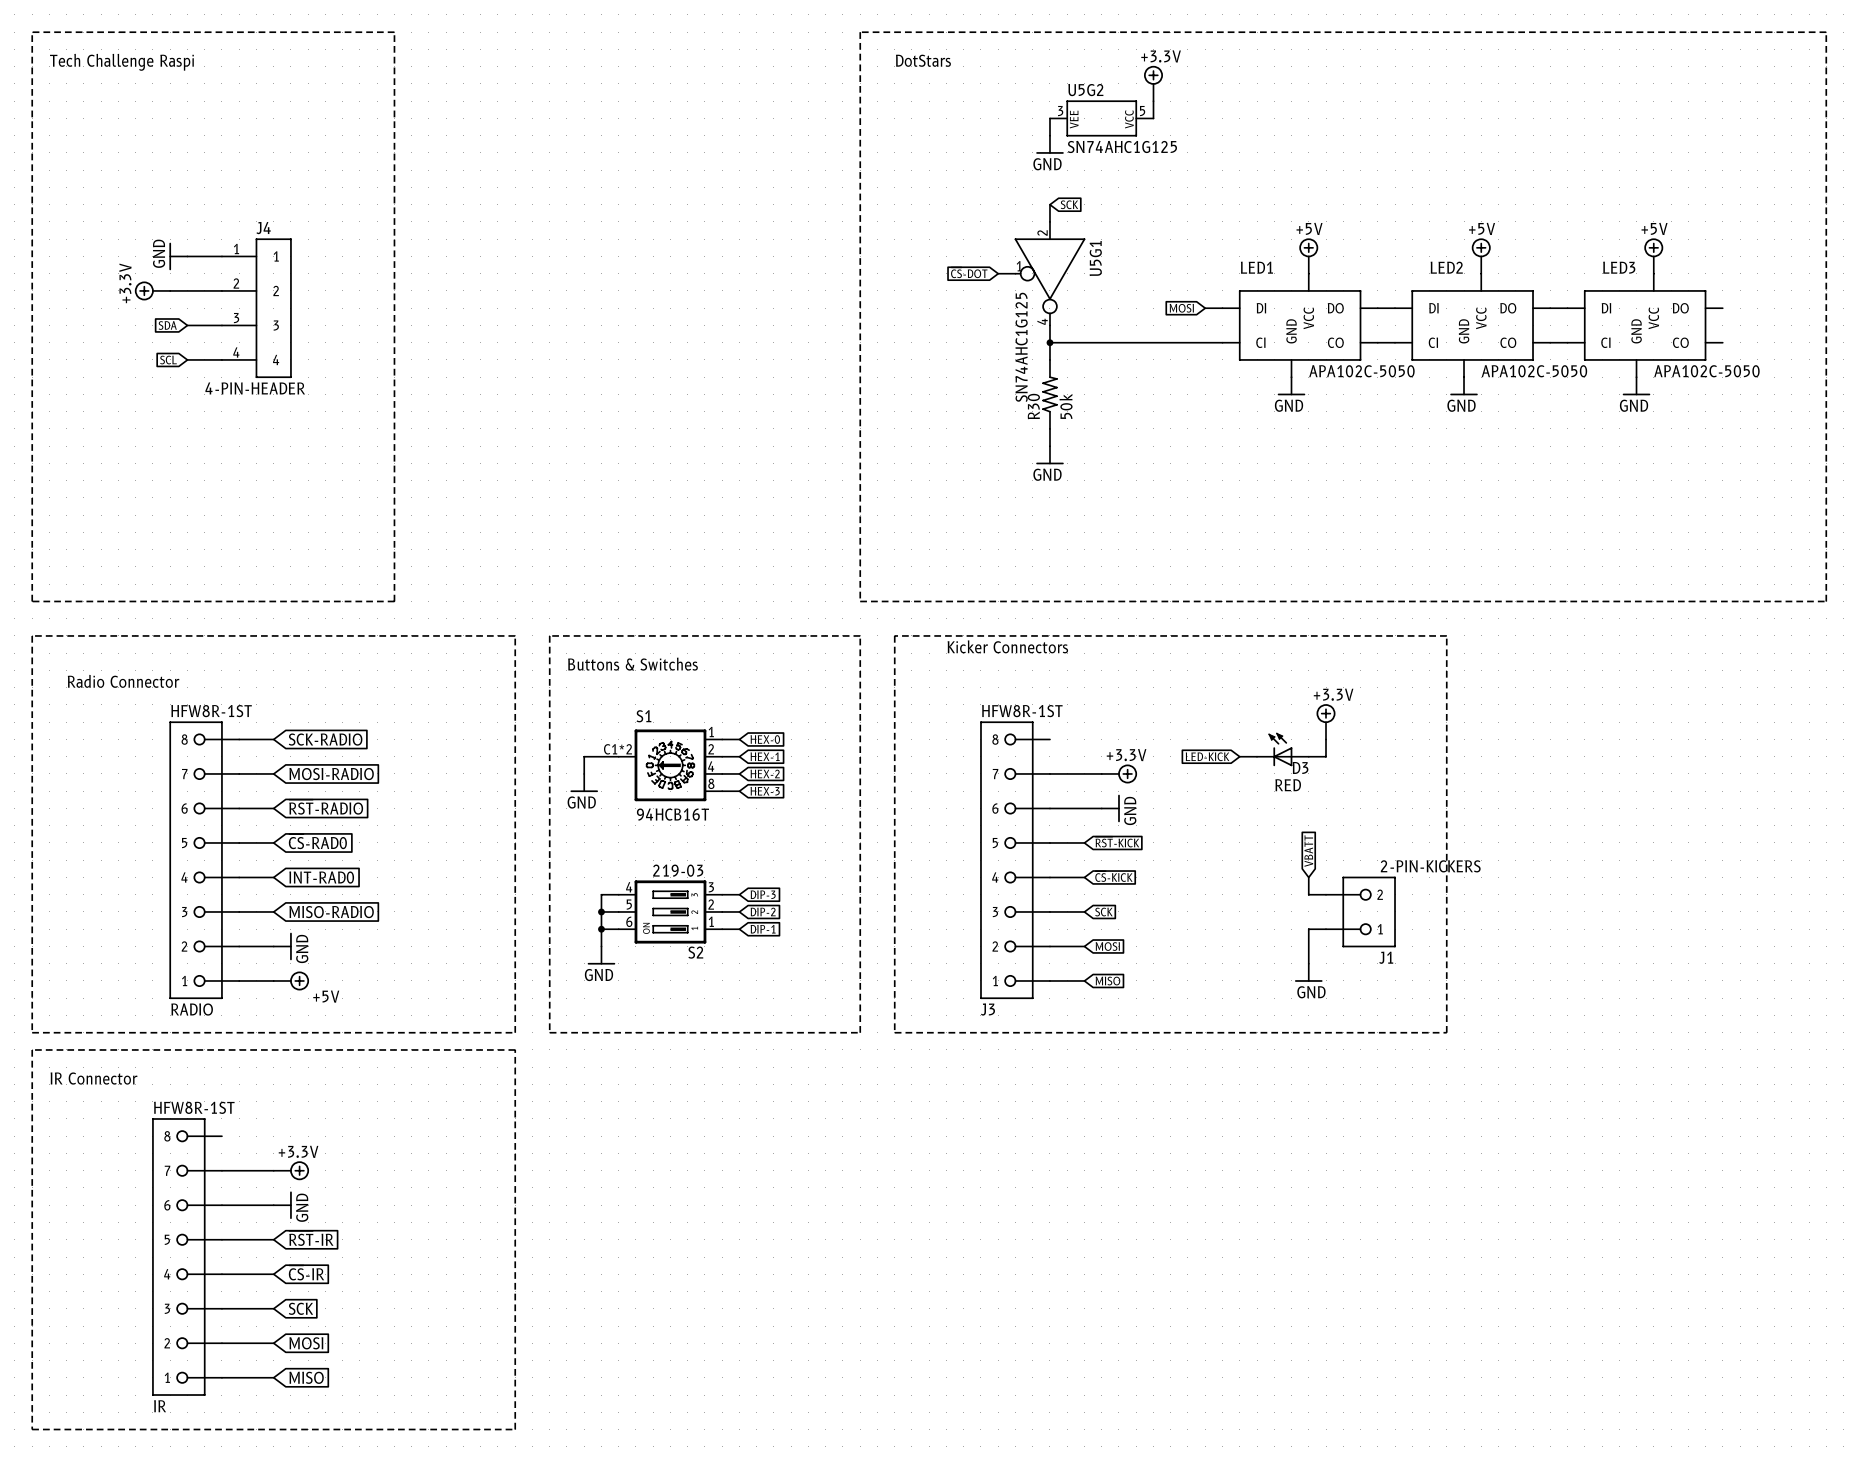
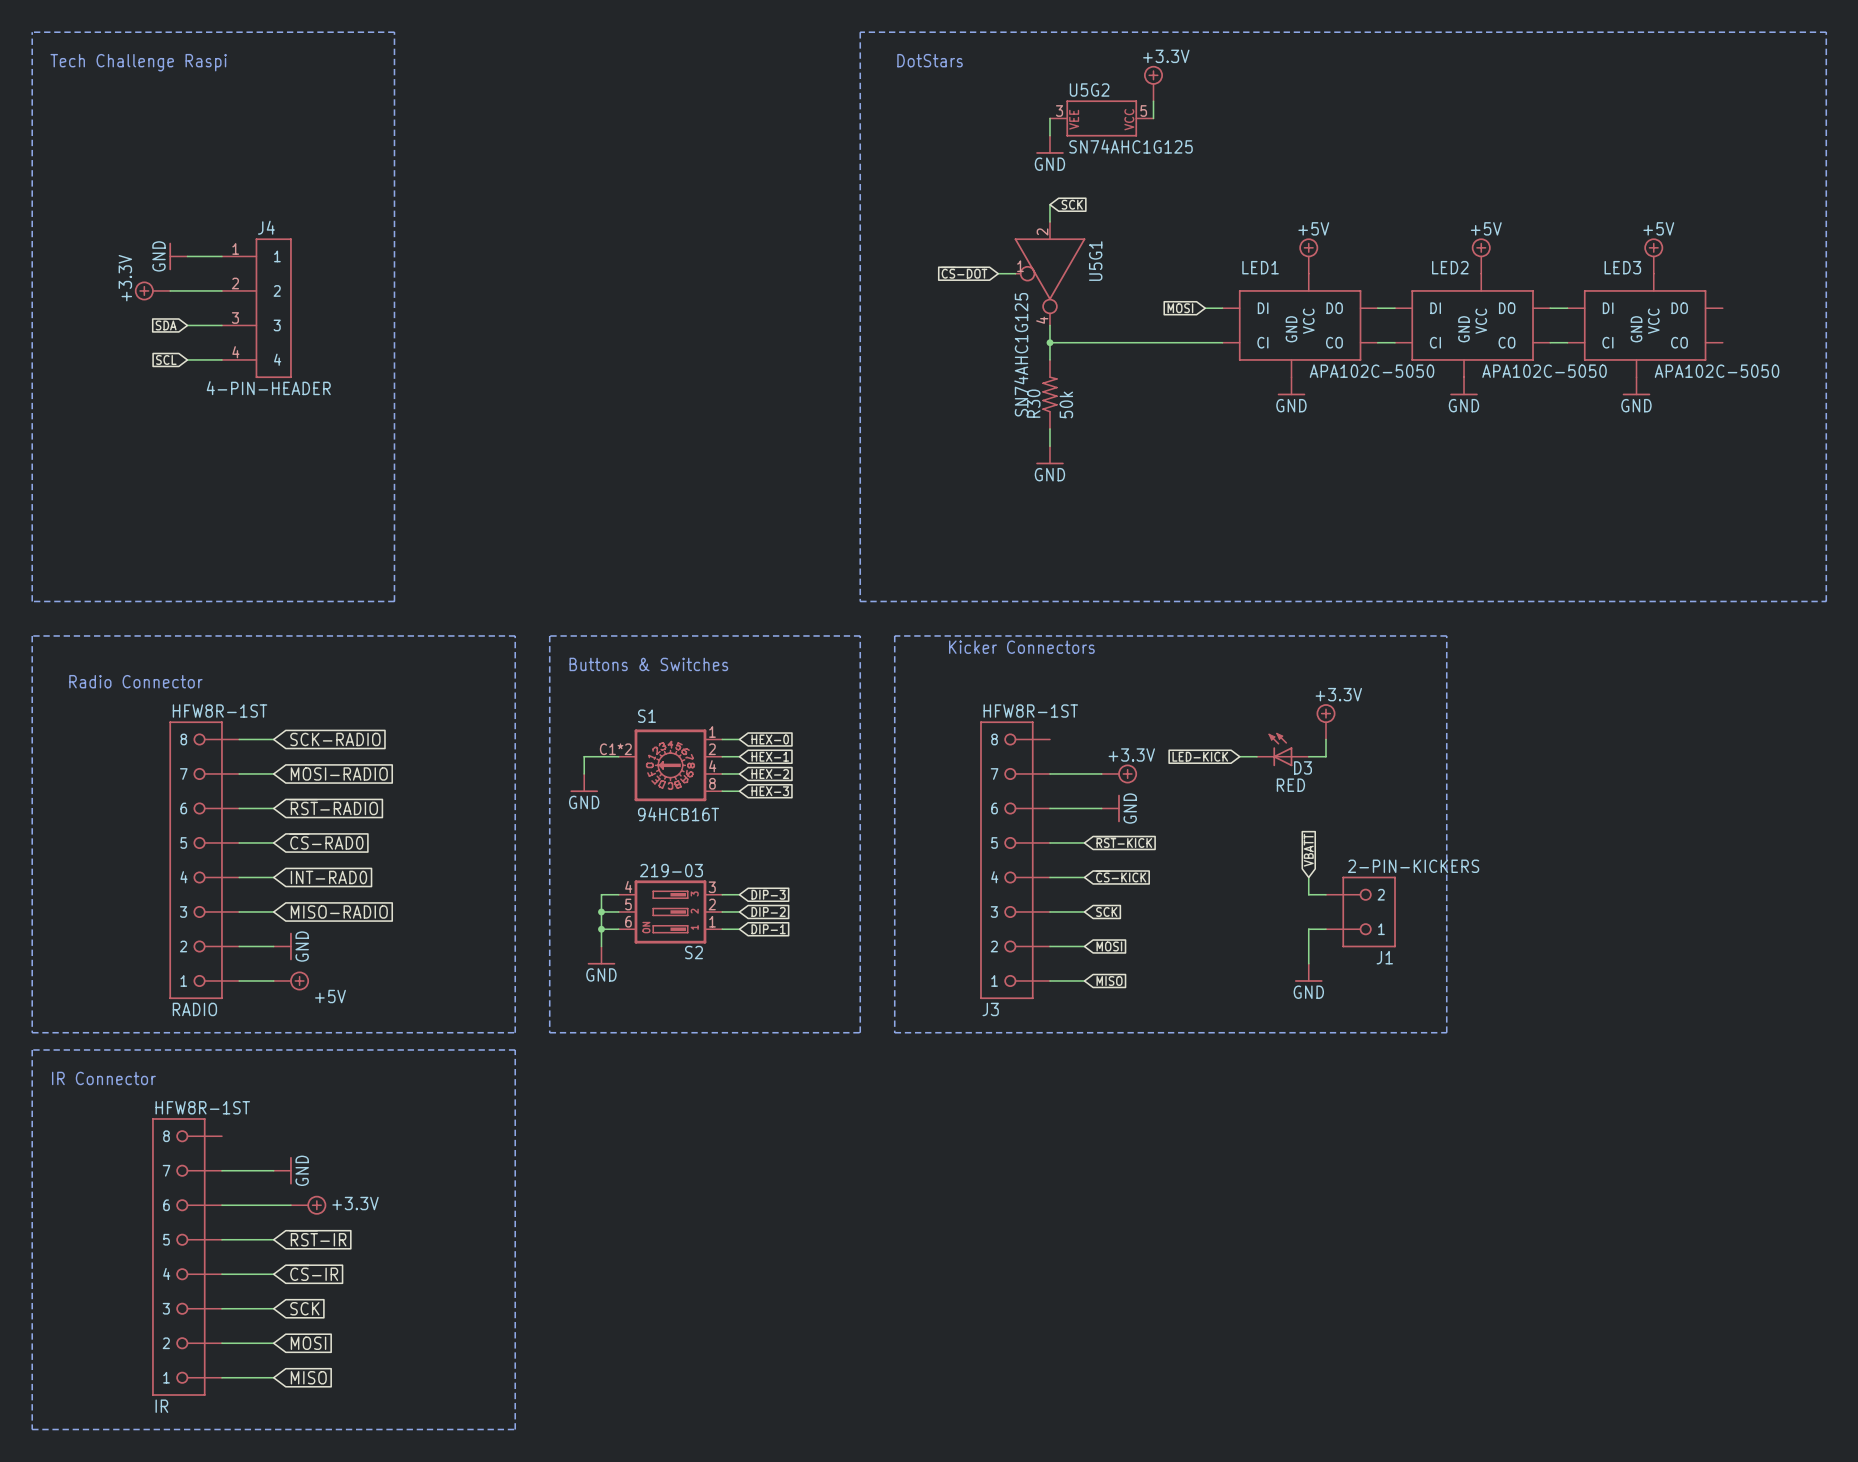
power symbol text position: +3.3V (298, 1151) -> +3.3V (355, 1203)
power symbol position: +3.3V (291, 1170) -> +3.3V (308, 1205)
power symbol position: GND (282, 1205) -> GND (282, 1170)

